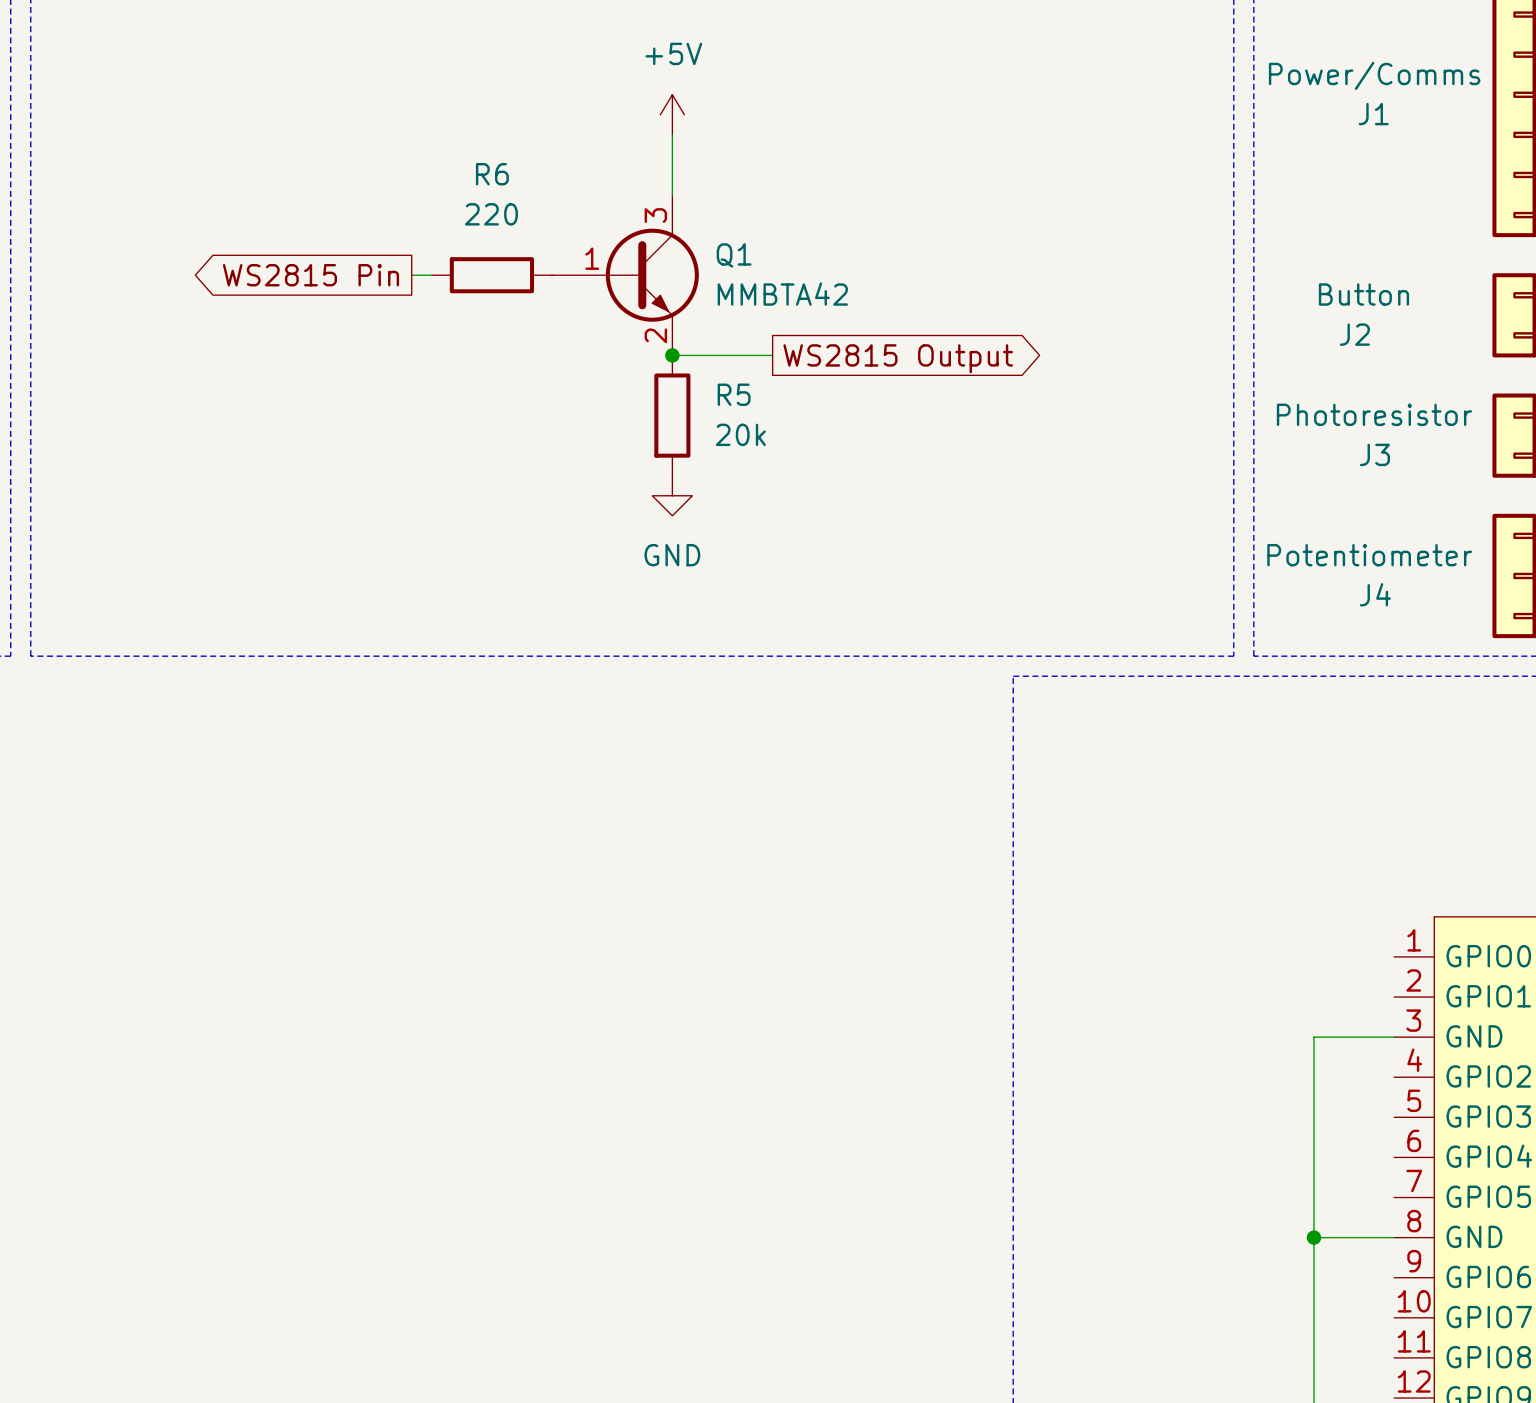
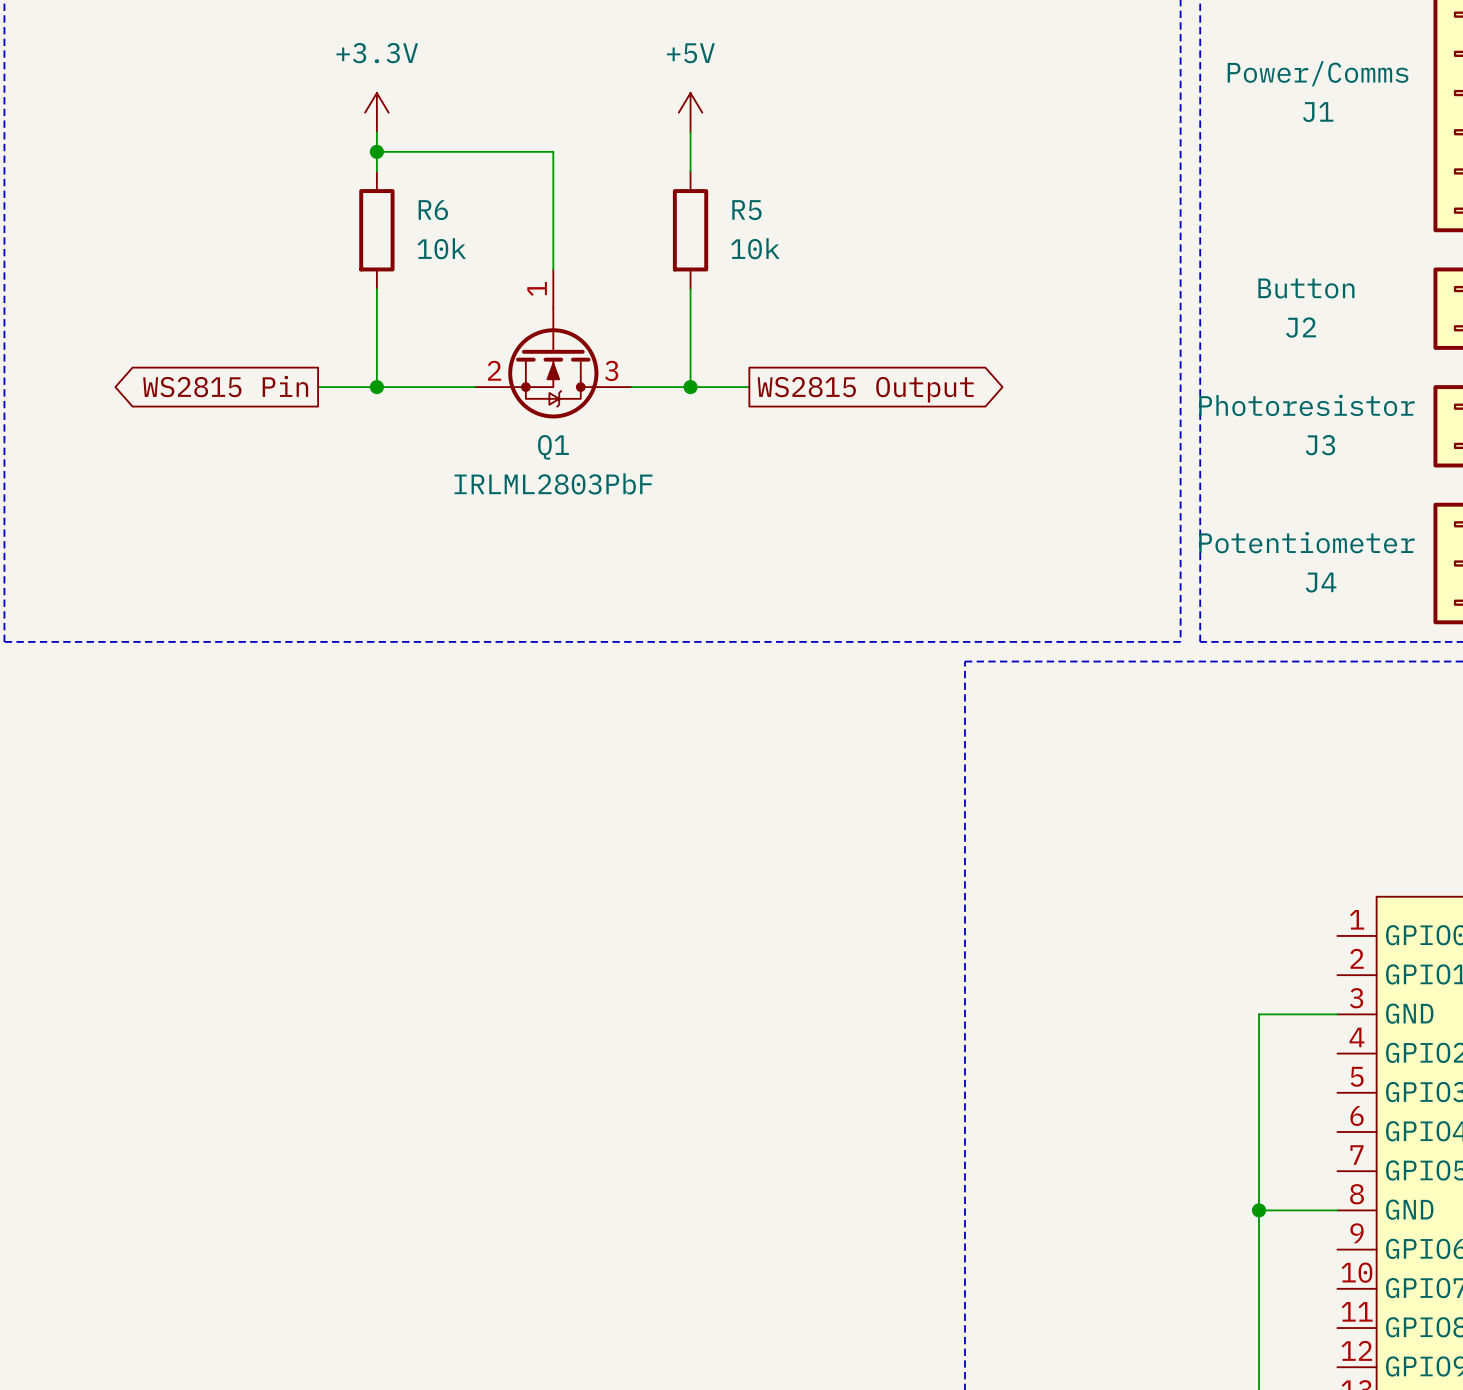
power symbol: none -> +3.3V (376, 112)
power symbol position: +5V (672, 114) -> +5V (690, 112)
wire: none -> (376, 132) (376, 171)
wire: (672, 134) (672, 195) -> none
wire: none -> (690, 132) (690, 171)
wire: none -> (376, 151) (553, 151) (553, 269)
junction: none -> (376, 151)
R6 name position: R6 (492, 174) -> R6 (433, 210)
Q1 symbol: [552, 195, 699, 356] -> [474, 269, 632, 419]
R6 value: 220 (491, 214) -> 10k (441, 248)
Q1 name position: Q1 (734, 255) -> Q1 (553, 447)
global label position: WS2815 Pin (310, 275) -> WS2815 Pin (225, 386)
R6 rotation: 0° (491, 275) -> 90° clockwise (376, 230)
R6 position: (491, 275) -> (376, 230)
Q1 value: MMBTA42 (782, 294) -> IRLML2803PbF (553, 483)
wire: none -> (376, 289) (376, 387)
wire: none -> (690, 289) (690, 387)
wire: (672, 355) (772, 355) -> none
junction position: (672, 355) -> (690, 387)
global label position: WS2815 Output (898, 358) -> WS2815 Output (865, 389)
wire: none -> (318, 387) (474, 387)
junction: none -> (376, 387)
wire: none -> (631, 387) (749, 387)
R5 position: (672, 415) -> (690, 230)
R5 value: 20k (740, 434) -> 10k (755, 248)
power symbol: GND (672, 495) -> none

